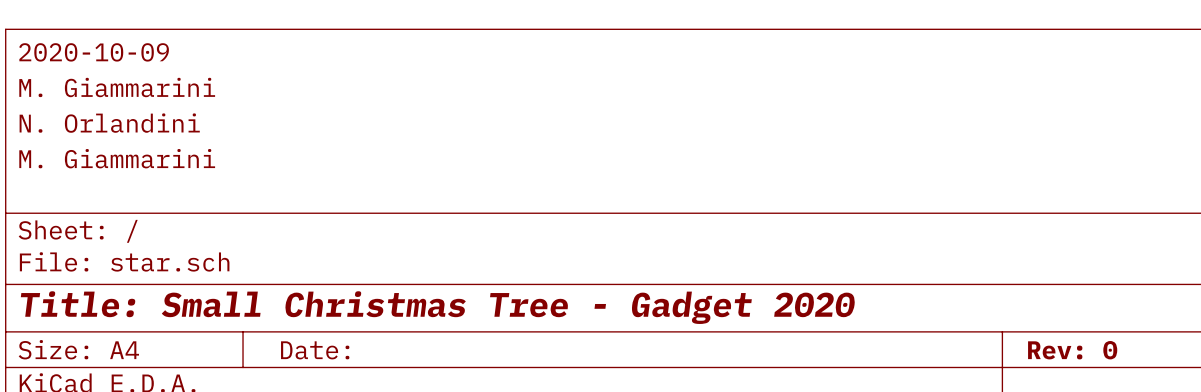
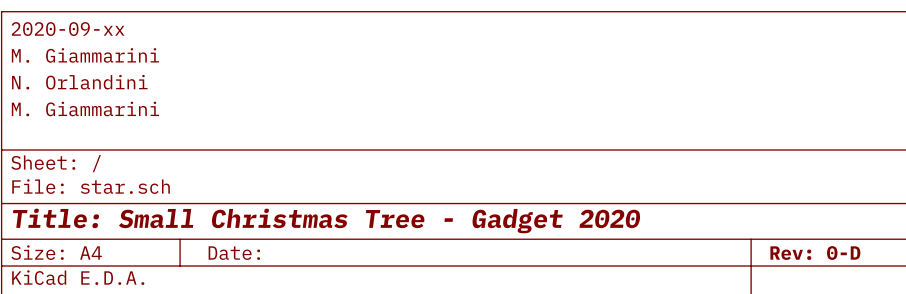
title block: 2020-10-09 (94, 52) -> 2020-09-xx (68, 29)
title block: Rev: 0 (1072, 350) -> Rev: 0-D (815, 253)

